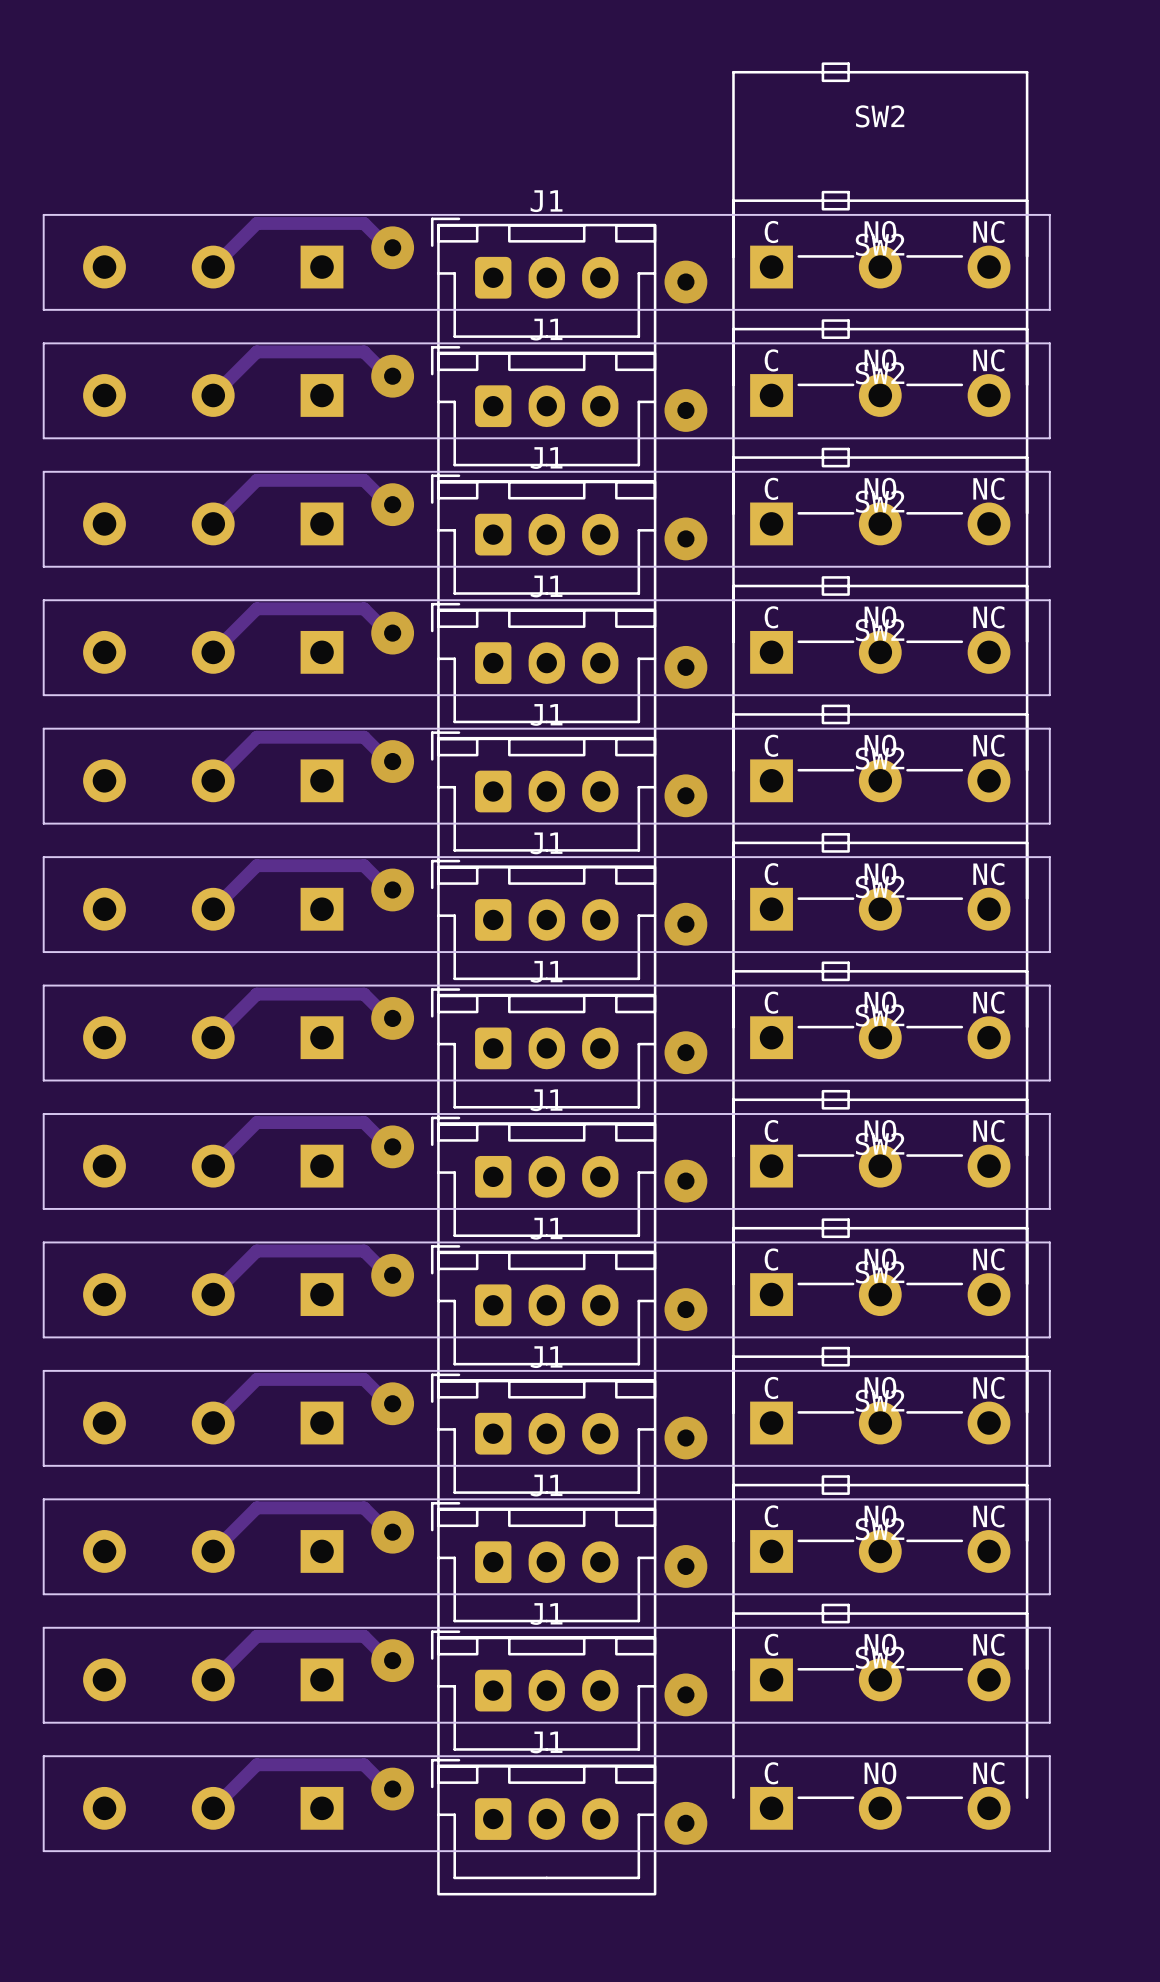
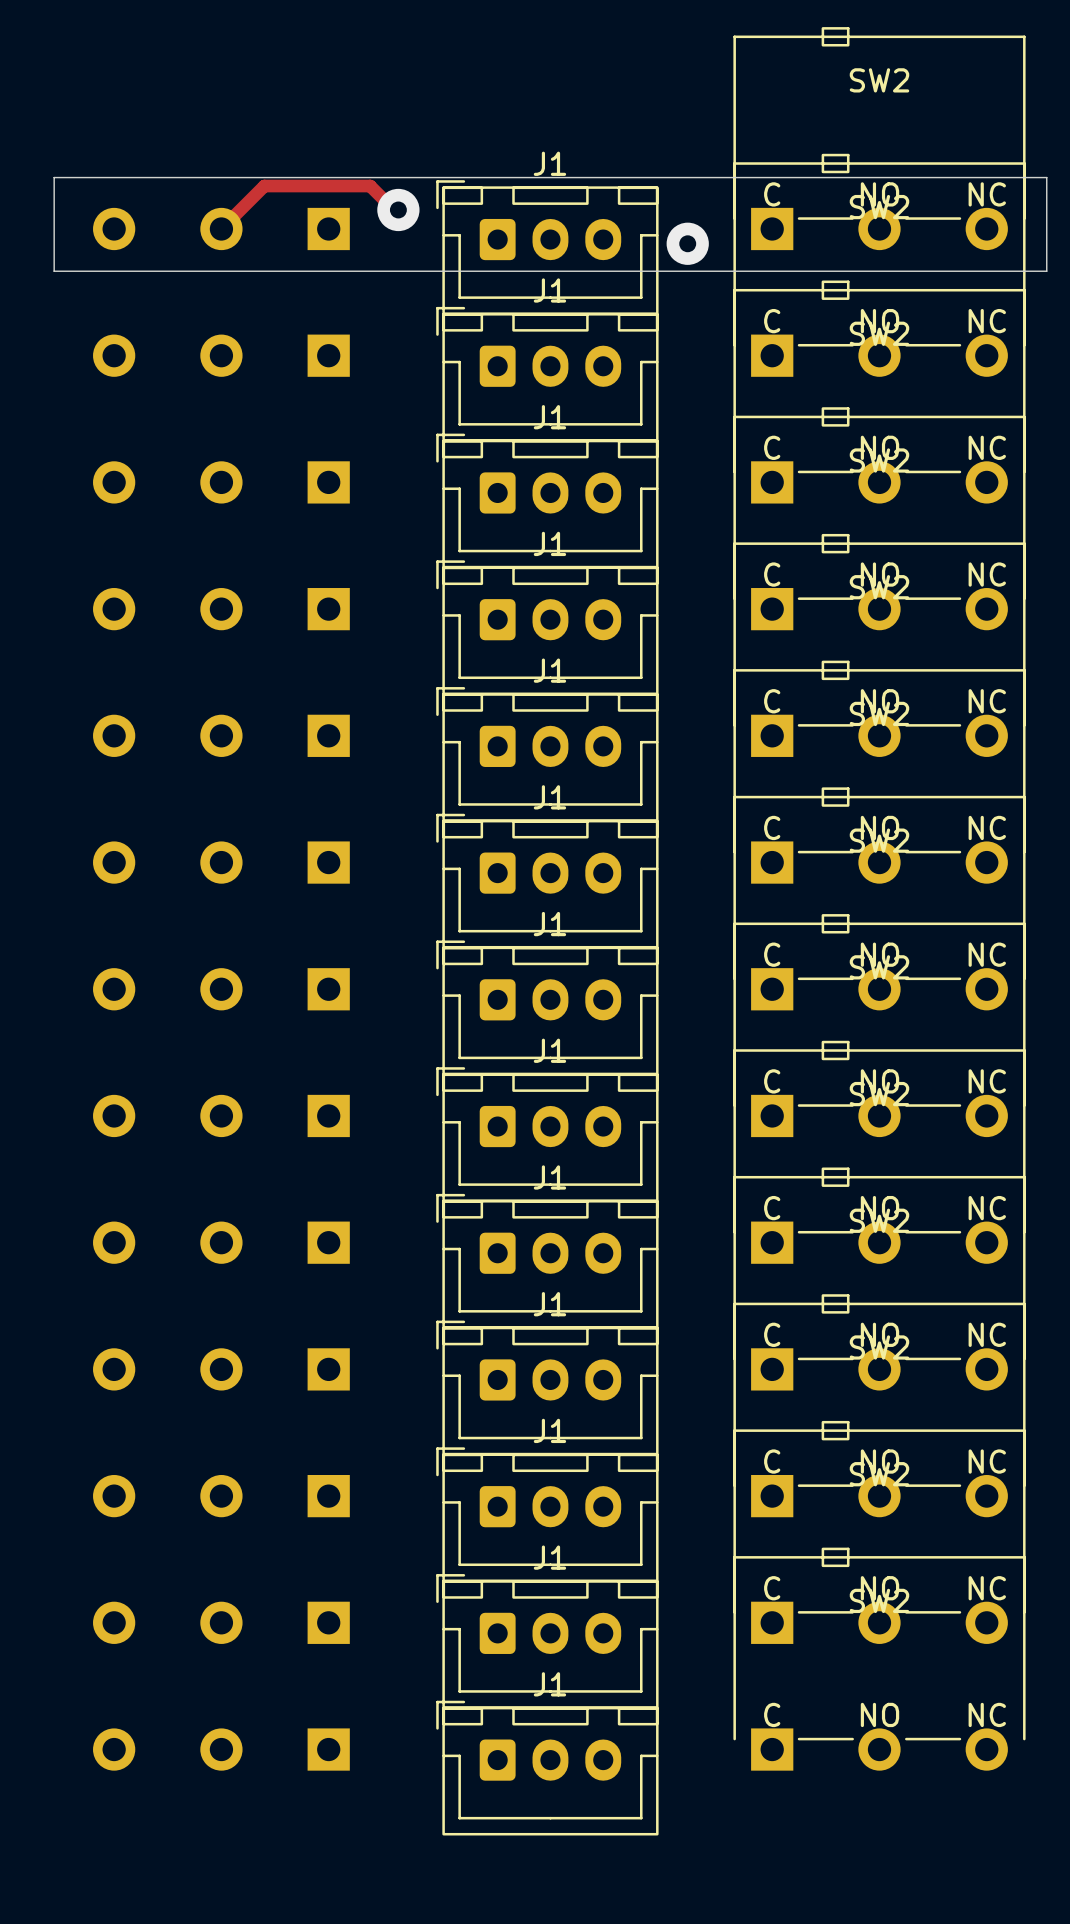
board edge: (43, 343) (1049, 343) (1049, 438) (43, 438) (43, 343) -> none
track: (392, 376) (388, 376) (364, 351) (256, 351) (213, 395) -> none
via: (392, 376) -> none
via: (685, 410) -> none
board edge: (43, 471) (43, 566) (1049, 566) (1049, 471) (43, 471) -> none
track: (392, 504) (388, 504) (364, 480) (256, 480) (213, 523) -> none
via: (392, 504) -> none
via: (685, 538) -> none
board edge: (43, 600) (43, 695) (1049, 695) (1049, 600) (43, 600) -> none
track: (392, 633) (388, 633) (364, 608) (256, 608) (213, 652) -> none
via: (392, 633) -> none
via: (685, 667) -> none
board edge: (43, 728) (43, 823) (1049, 823) (1049, 728) (43, 728) -> none
track: (392, 761) (388, 761) (364, 737) (256, 737) (213, 780) -> none
via: (392, 761) -> none
via: (685, 795) -> none
board edge: (43, 857) (43, 952) (1049, 952) (1049, 857) (43, 857) -> none
track: (392, 889) (388, 889) (364, 865) (256, 865) (213, 909) -> none
via: (392, 889) -> none
via: (685, 924) -> none
board edge: (43, 985) (43, 1080) (1049, 1080) (1049, 985) (43, 985) -> none
track: (392, 1018) (388, 1018) (364, 994) (256, 994) (213, 1037) -> none
via: (392, 1018) -> none
via: (685, 1052) -> none
board edge: (43, 1114) (43, 1208) (1049, 1208) (1049, 1114) (43, 1114) -> none
track: (392, 1146) (388, 1146) (364, 1122) (256, 1122) (213, 1166) -> none
via: (392, 1146) -> none
via: (685, 1181) -> none
board edge: (43, 1242) (43, 1337) (1049, 1337) (1049, 1242) (43, 1242) -> none
track: (392, 1275) (388, 1275) (364, 1251) (256, 1251) (213, 1294) -> none
via: (392, 1275) -> none
via: (685, 1309) -> none
board edge: (43, 1370) (43, 1465) (1049, 1465) (1049, 1370) (43, 1370) -> none
track: (392, 1403) (388, 1403) (364, 1379) (256, 1379) (213, 1423) -> none
via: (392, 1403) -> none
via: (685, 1438) -> none
board edge: (43, 1499) (43, 1594) (1049, 1594) (1049, 1499) (43, 1499) -> none
track: (392, 1532) (388, 1532) (364, 1507) (256, 1507) (213, 1551) -> none
via: (392, 1532) -> none
via: (685, 1566) -> none
board edge: (43, 1627) (43, 1722) (1049, 1722) (1049, 1627) (43, 1627) -> none
track: (392, 1660) (388, 1660) (364, 1636) (256, 1636) (213, 1679) -> none
via: (392, 1660) -> none
via: (685, 1694) -> none
board edge: (43, 1756) (43, 1851) (1049, 1851) (1049, 1756) (43, 1756) -> none
track: (392, 1789) (388, 1789) (364, 1764) (256, 1764) (213, 1808) -> none
via: (392, 1789) -> none
via: (685, 1823) -> none

